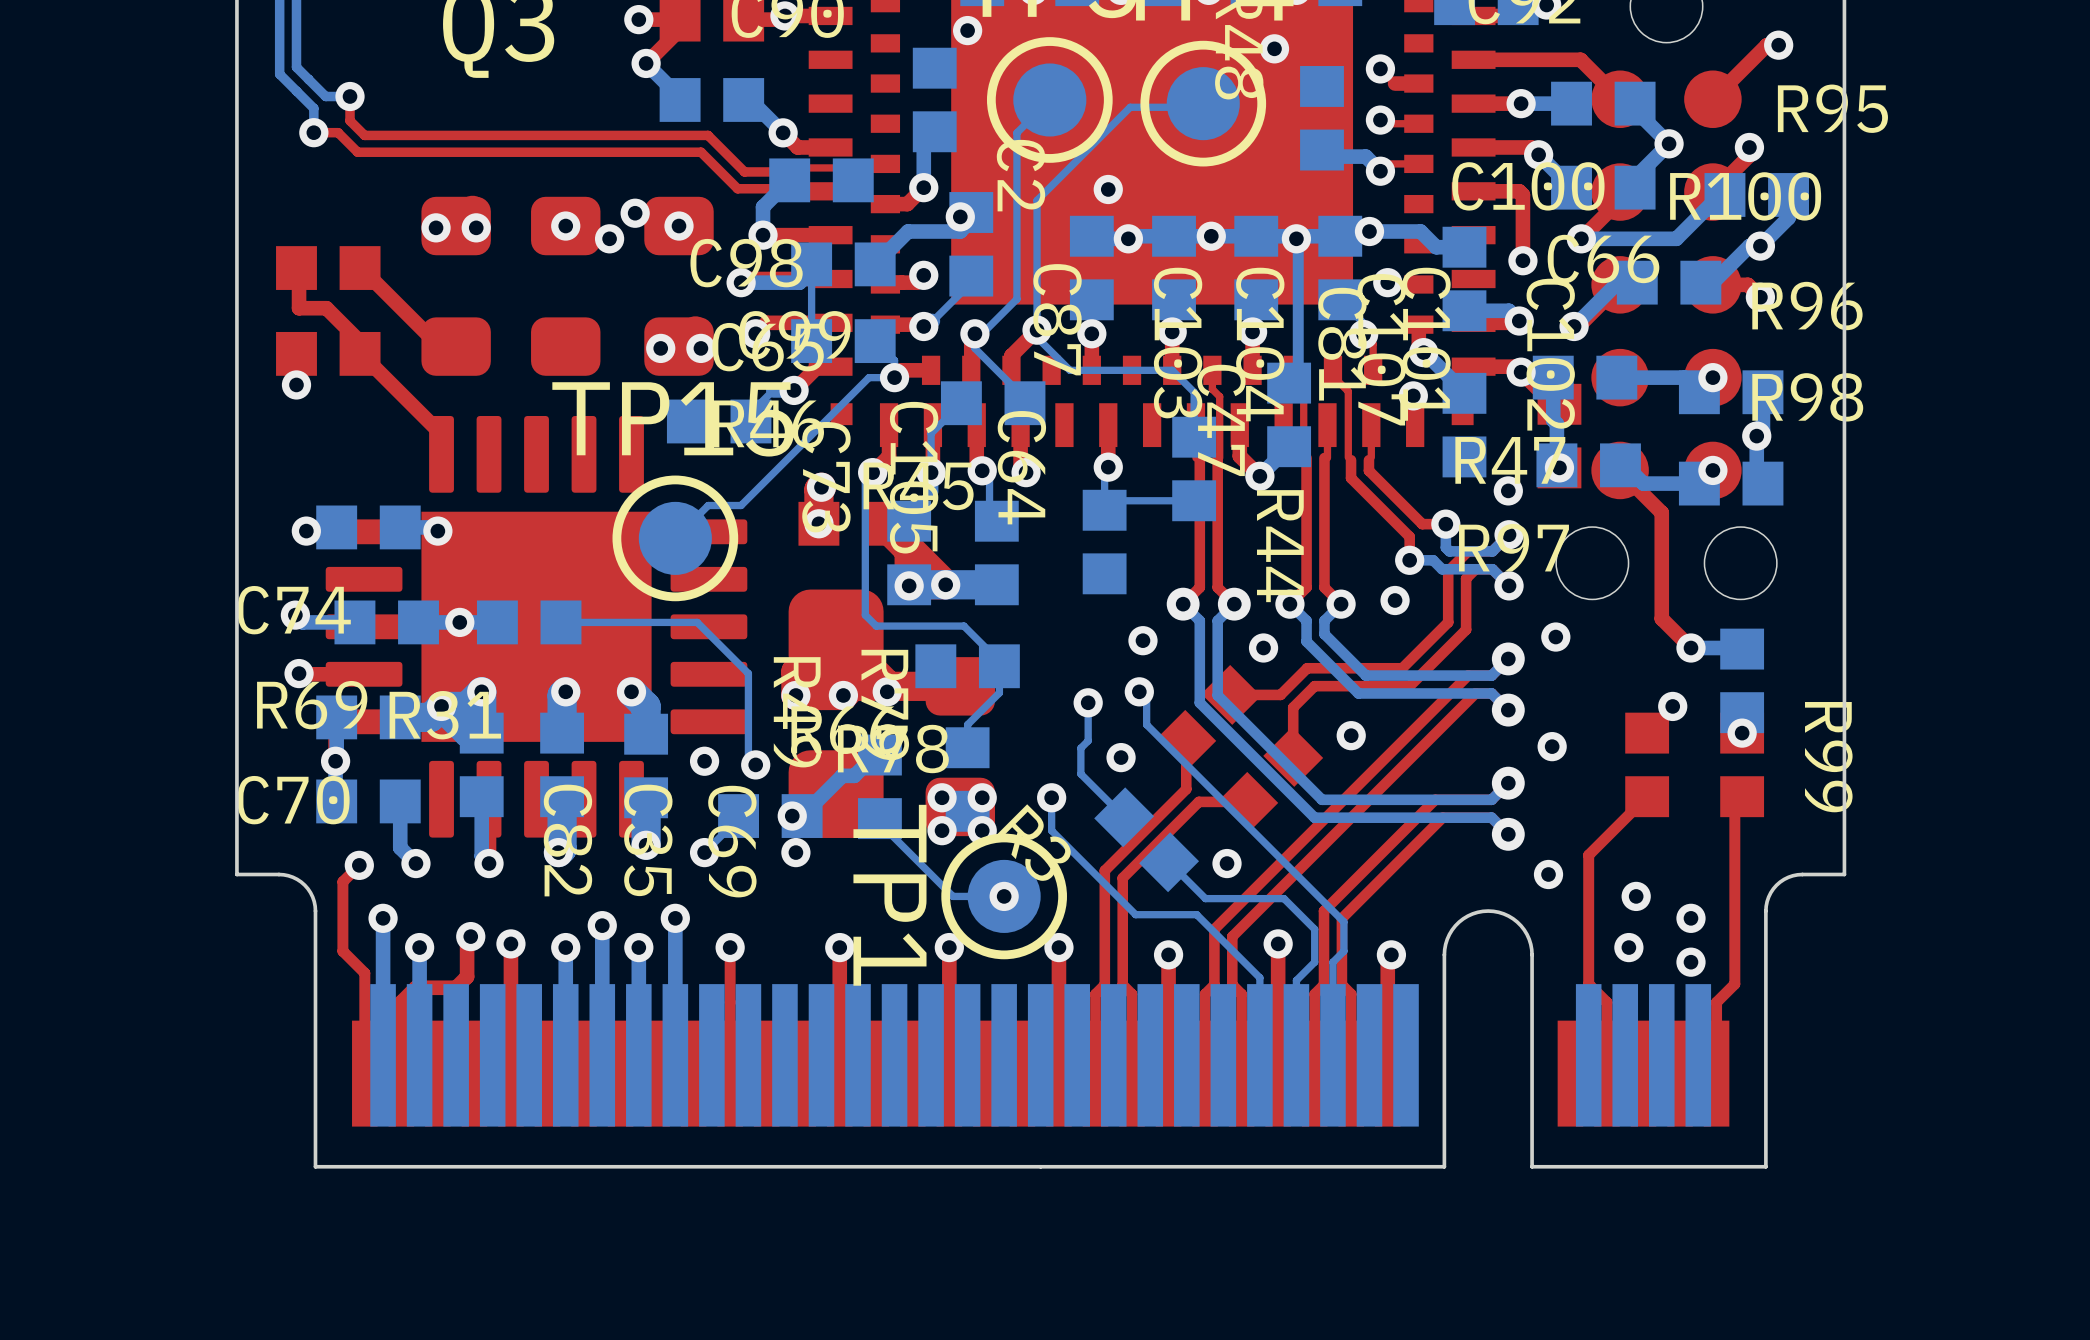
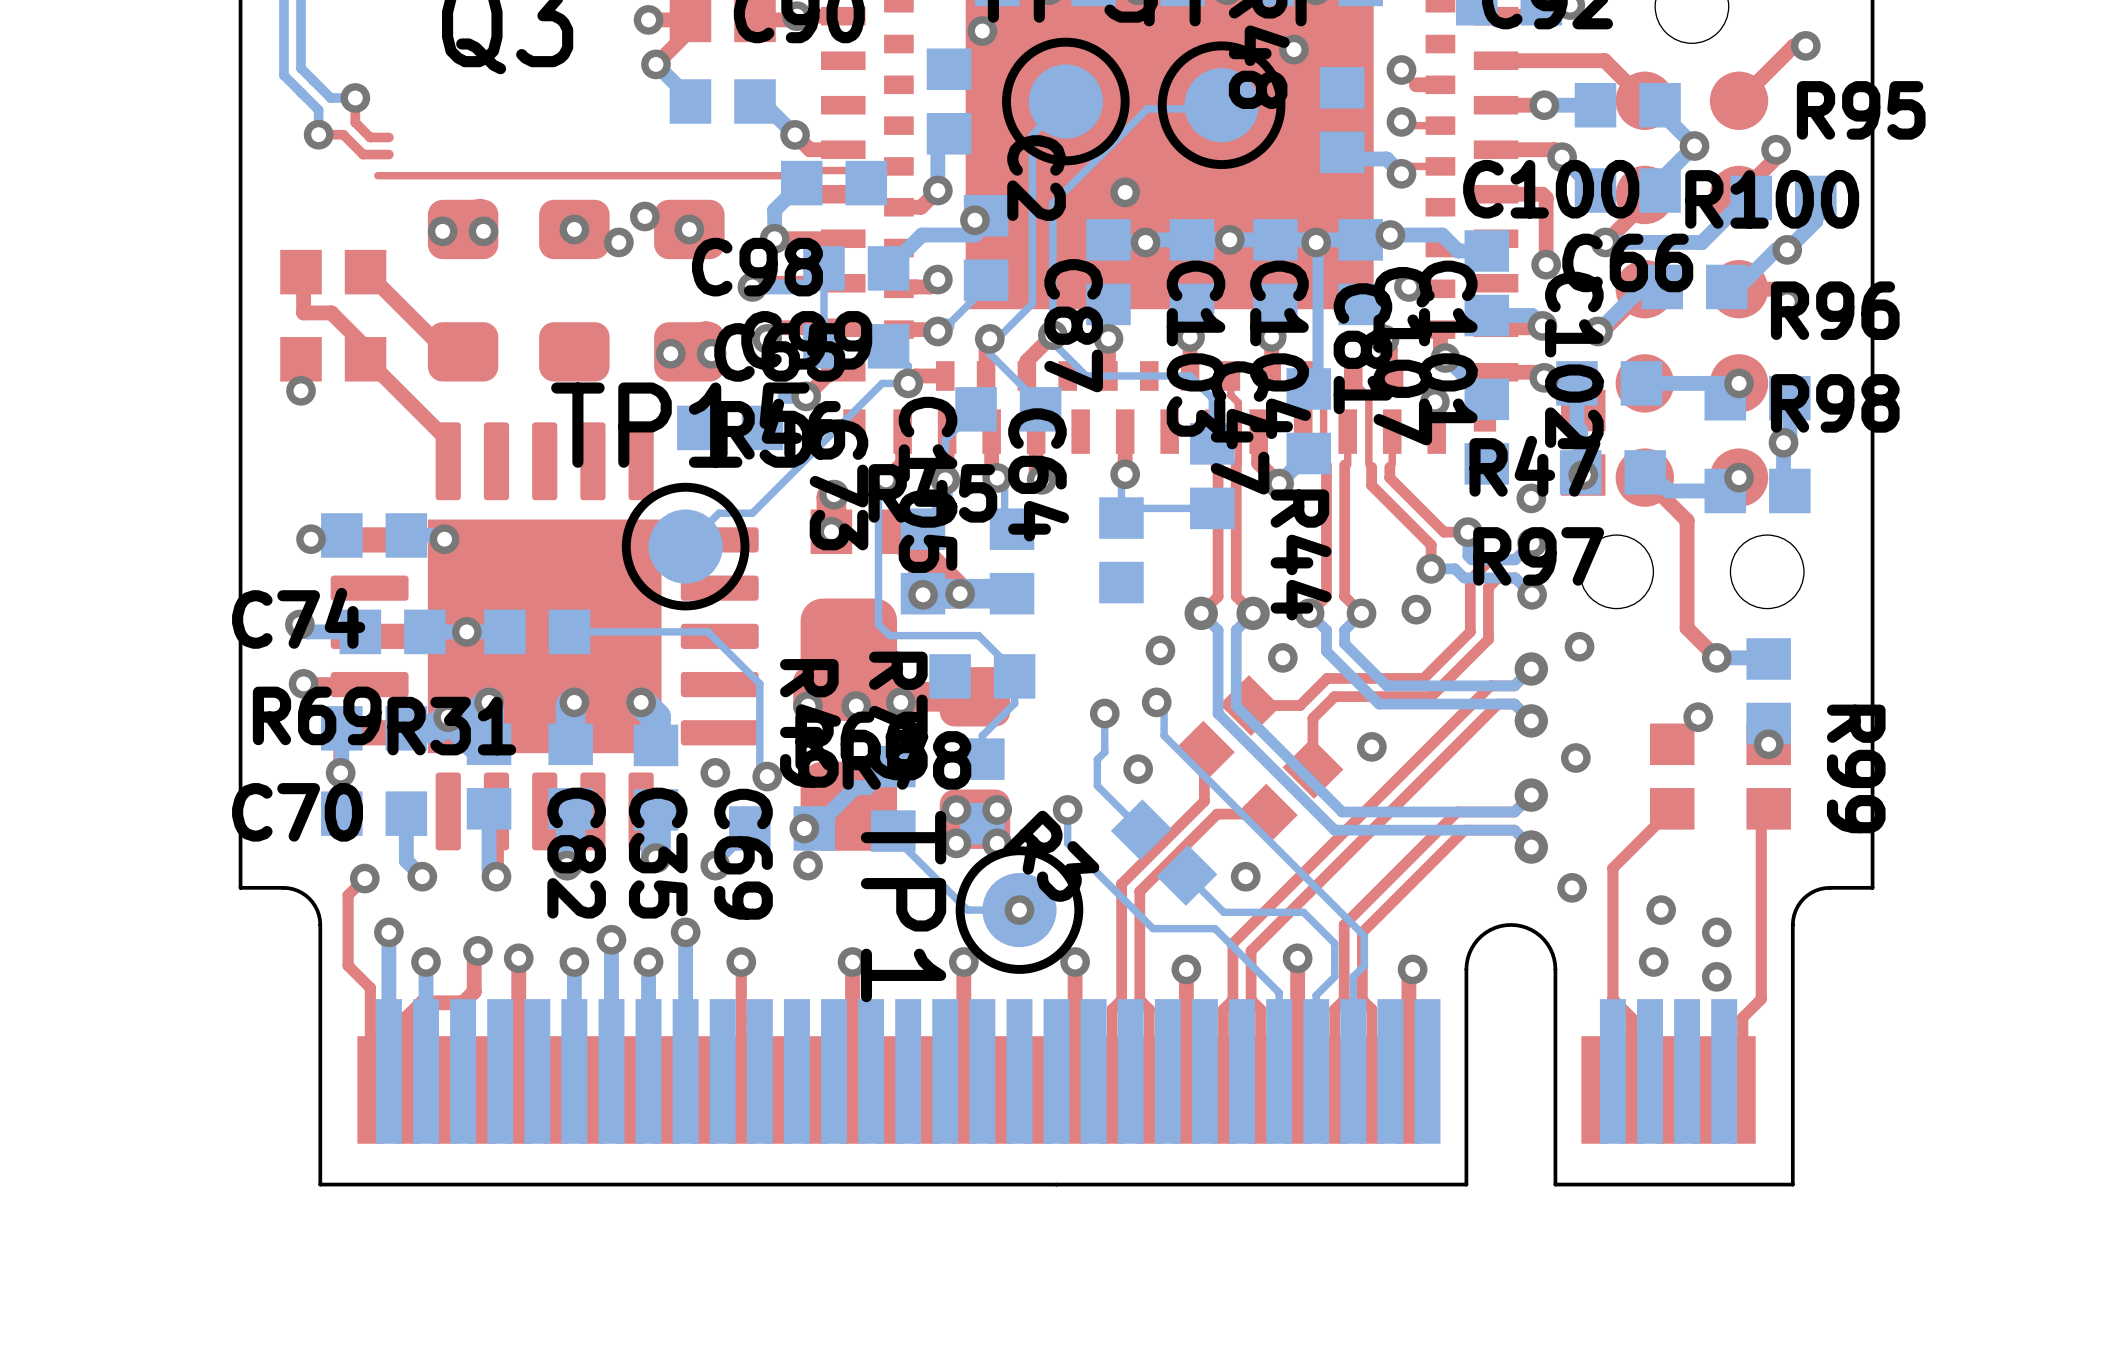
top track: (383, 135) (708, 135) (744, 171) (795, 171) -> none
top track: (383, 152) (701, 152) (737, 188) (795, 188) -> none
top track: none -> (377, 175) (791, 175) (809, 194)

